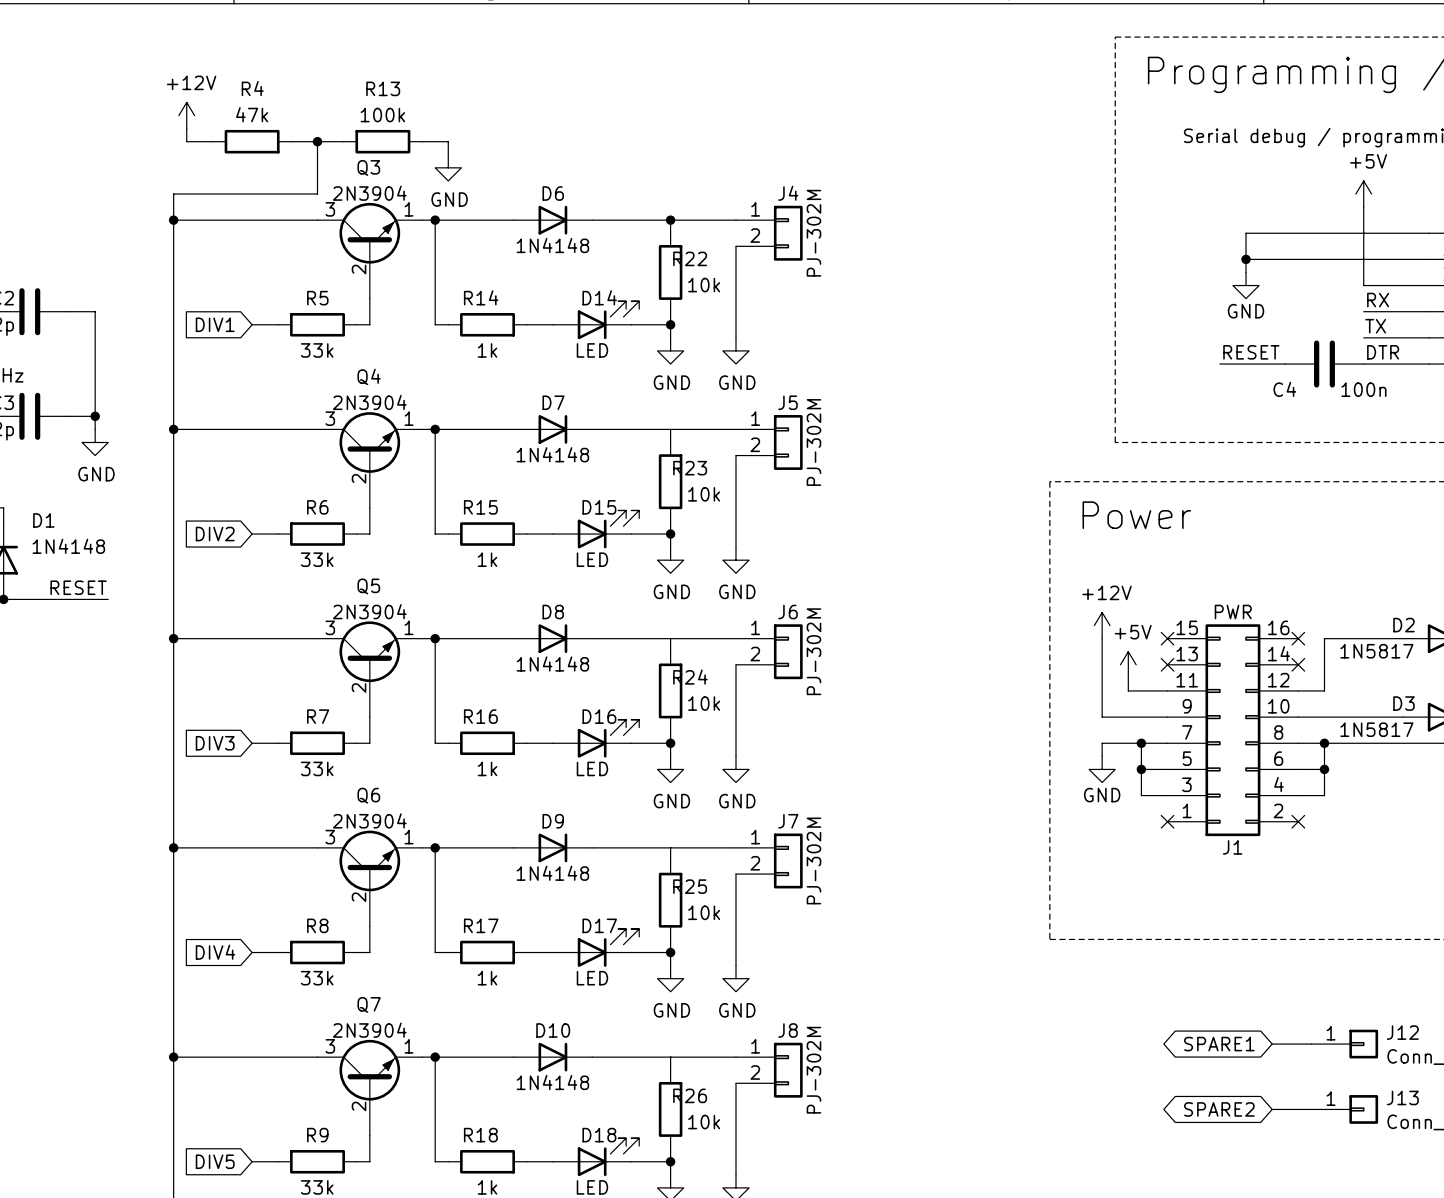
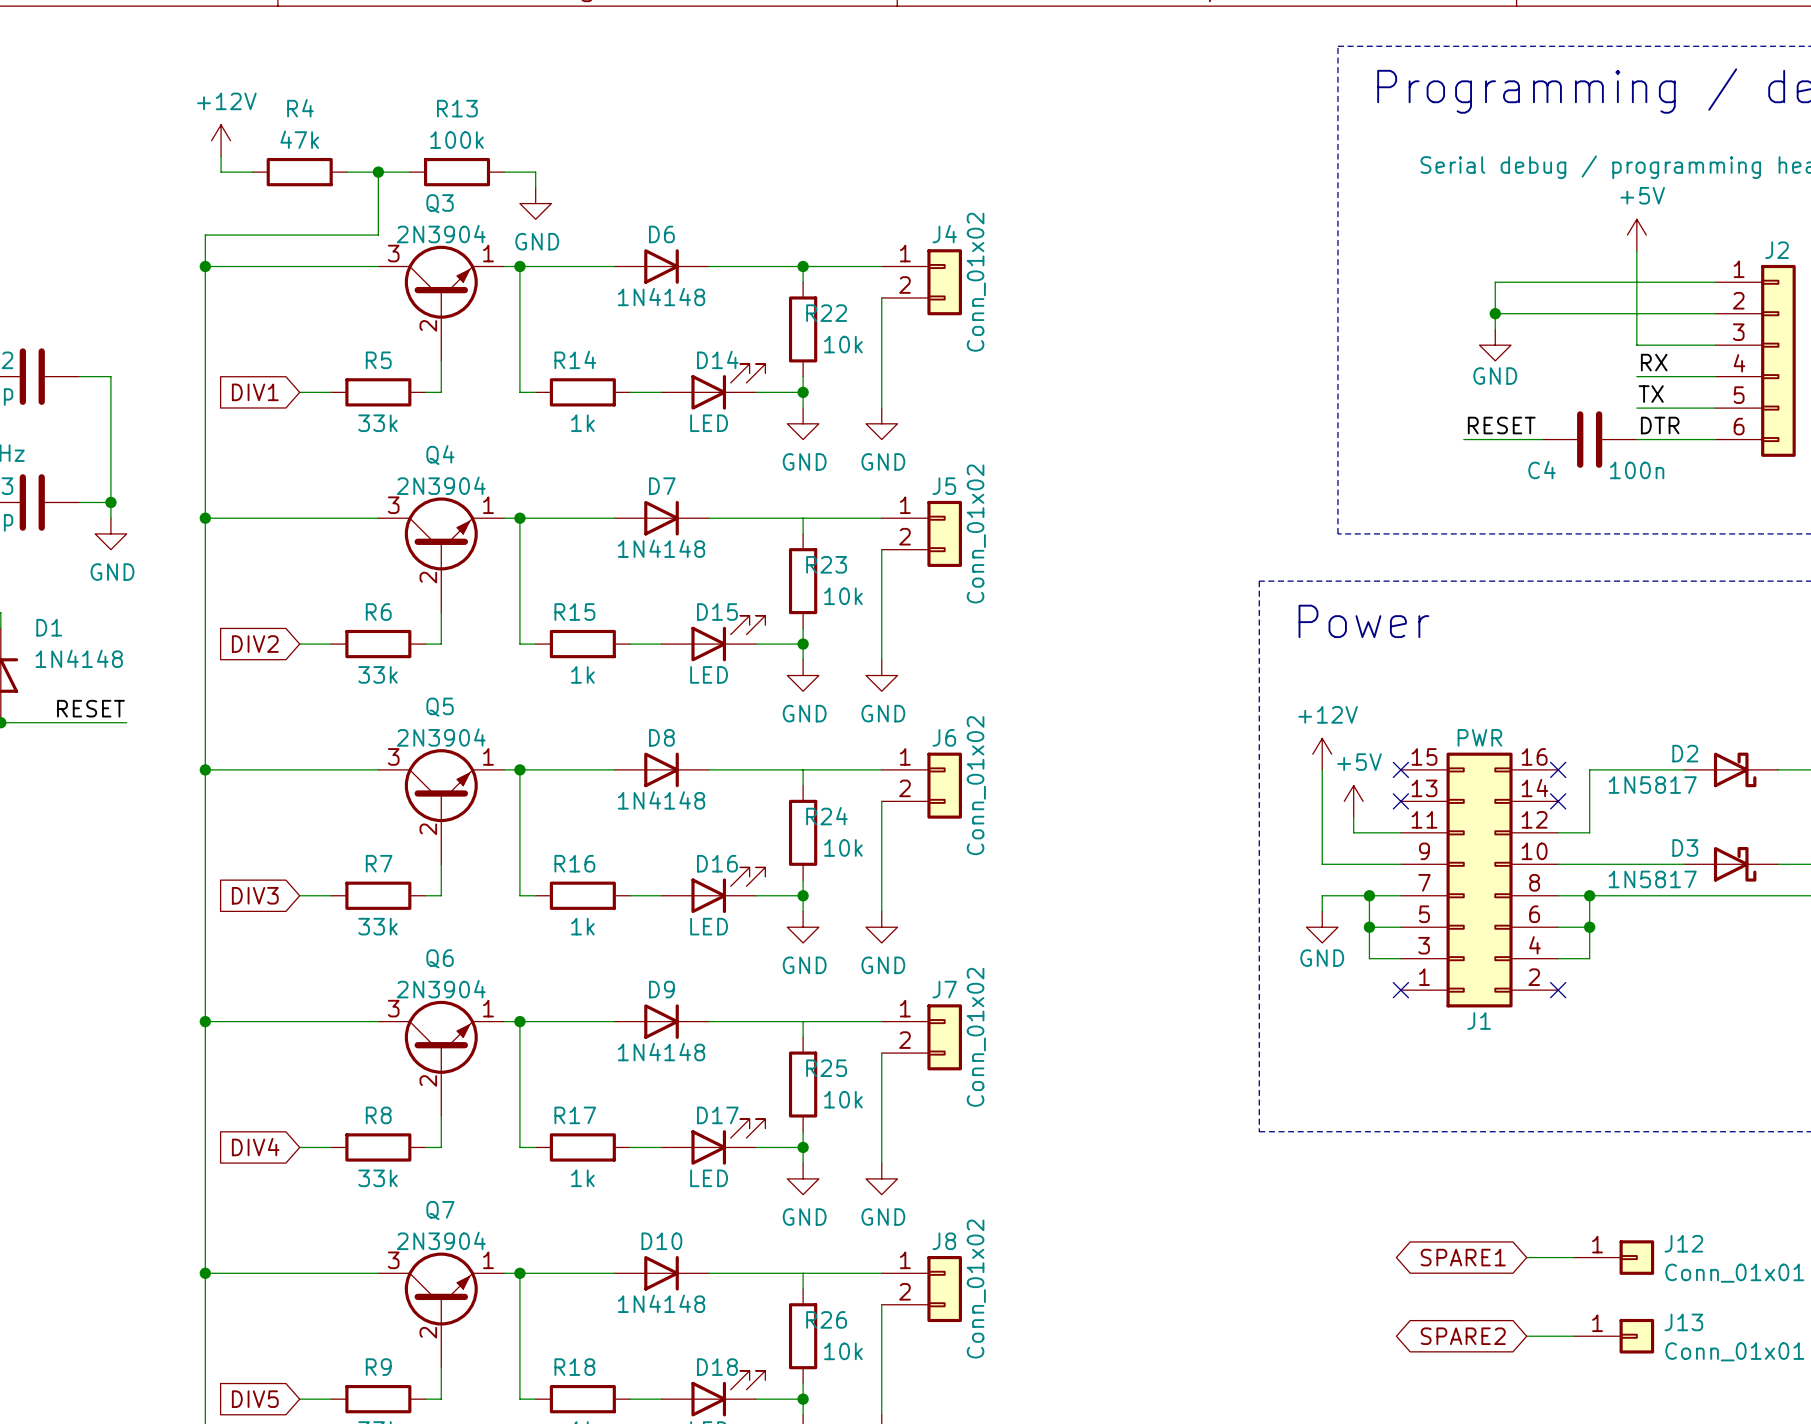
J4 value: PJ-302M (813, 233) -> Conn_01x02 (976, 282)
J5 value: PJ-302M (813, 442) -> Conn_01x02 (976, 533)
J6 value: PJ-302M (813, 651) -> Conn_01x02 (976, 785)
J7 value: PJ-302M (813, 860) -> Conn_01x02 (976, 1037)
J8 value: PJ-302M (813, 1070) -> Conn_01x02 (976, 1289)

